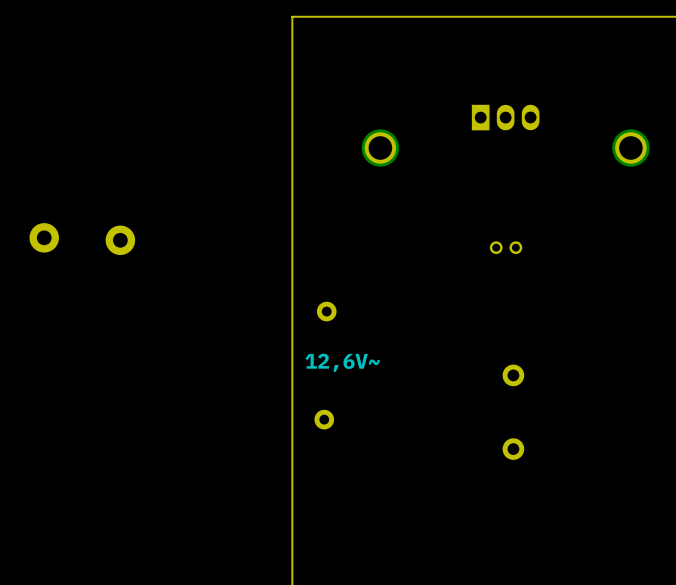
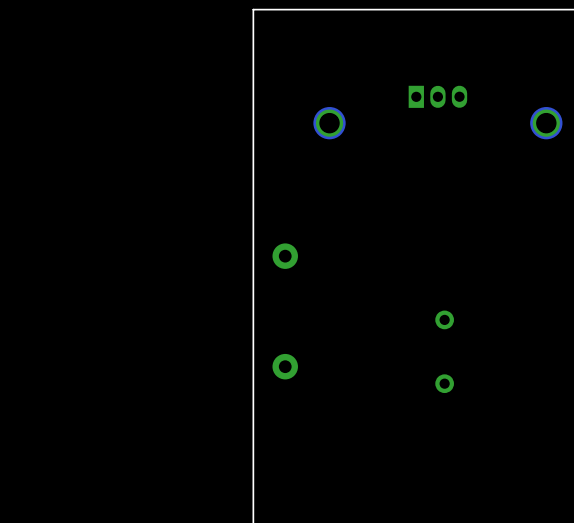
part: (44, 237) -> none
part: (120, 240) -> none
part: (506, 247) -> none
part: none -> (285, 256)
part: (326, 311) -> none
text: 12,6V~ (342, 362) -> none
part: (324, 419) -> none
part: none -> (285, 366)

